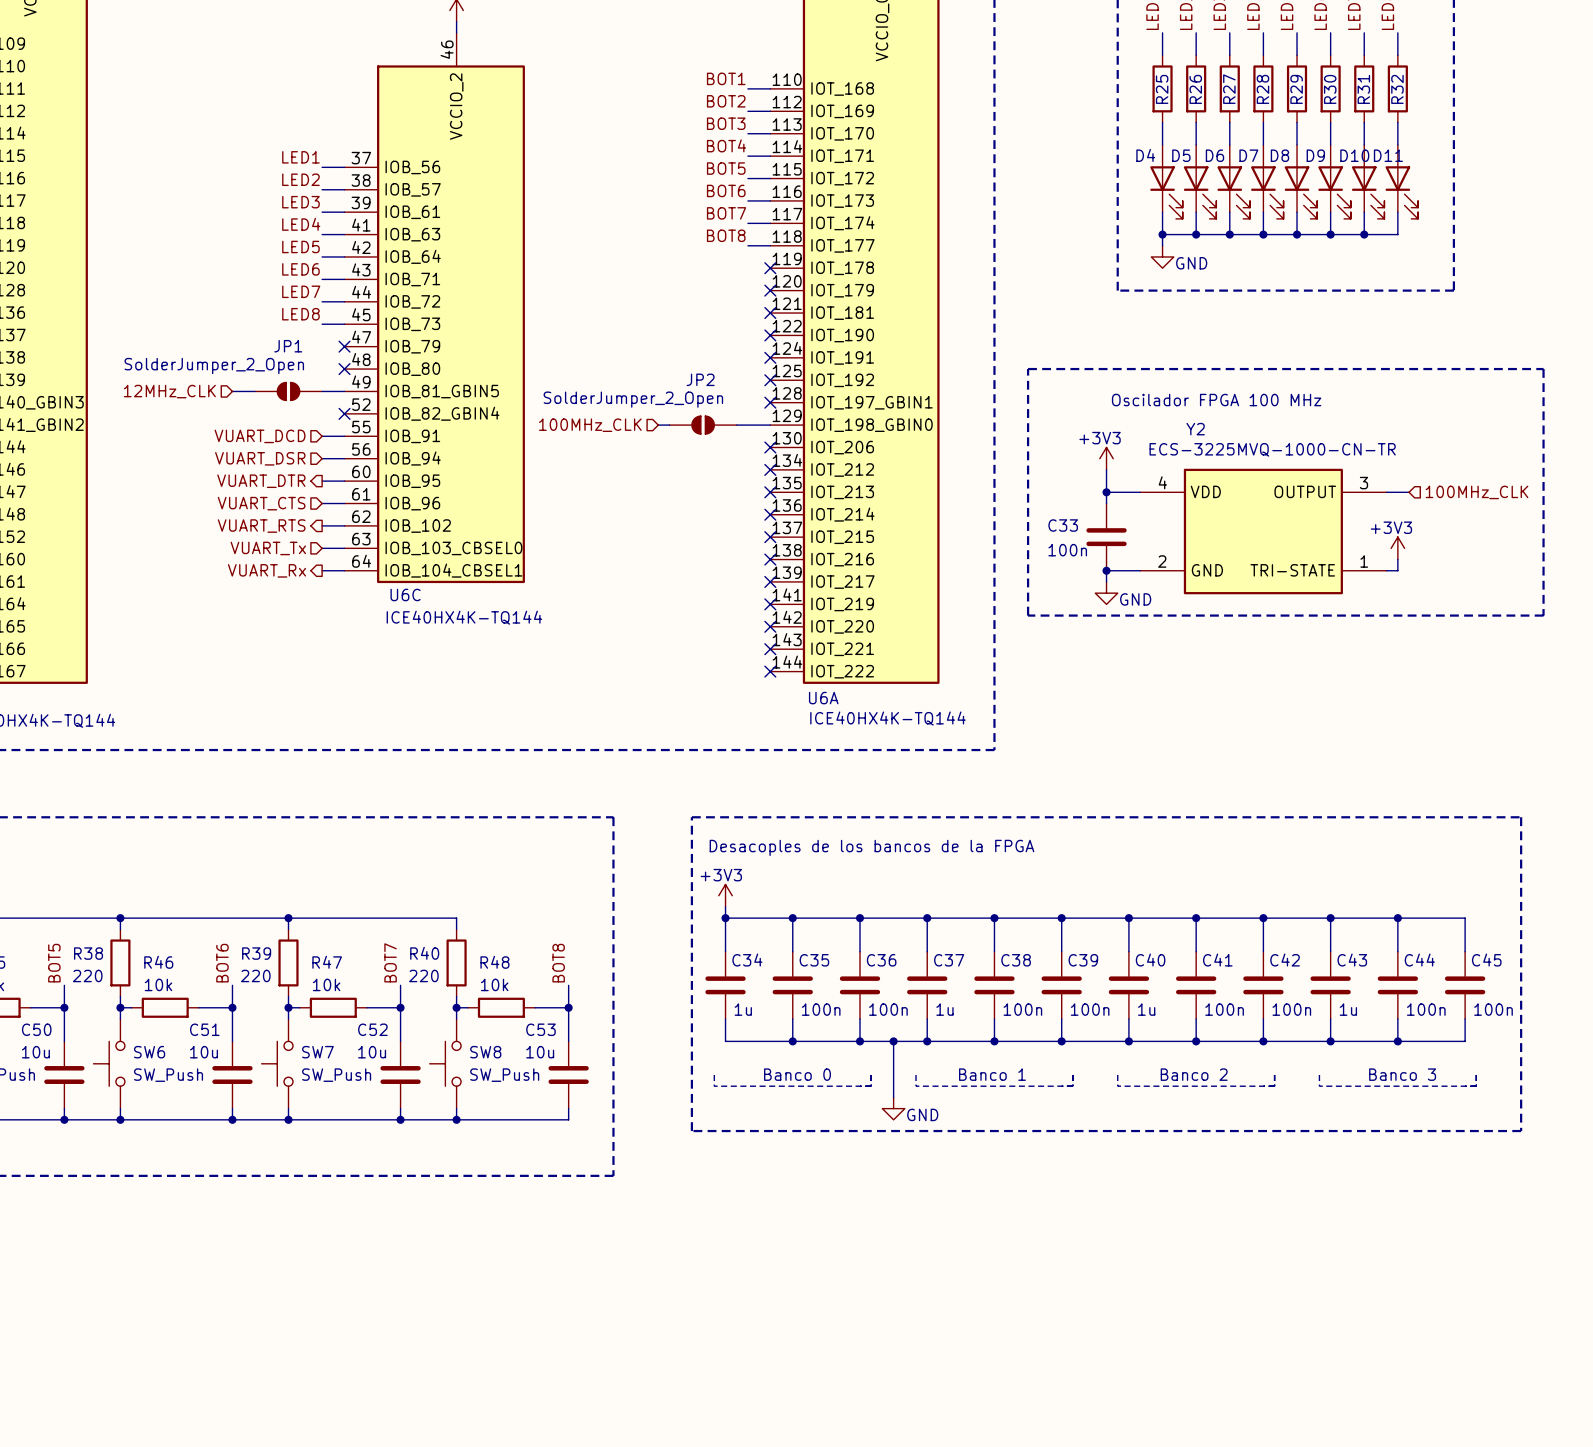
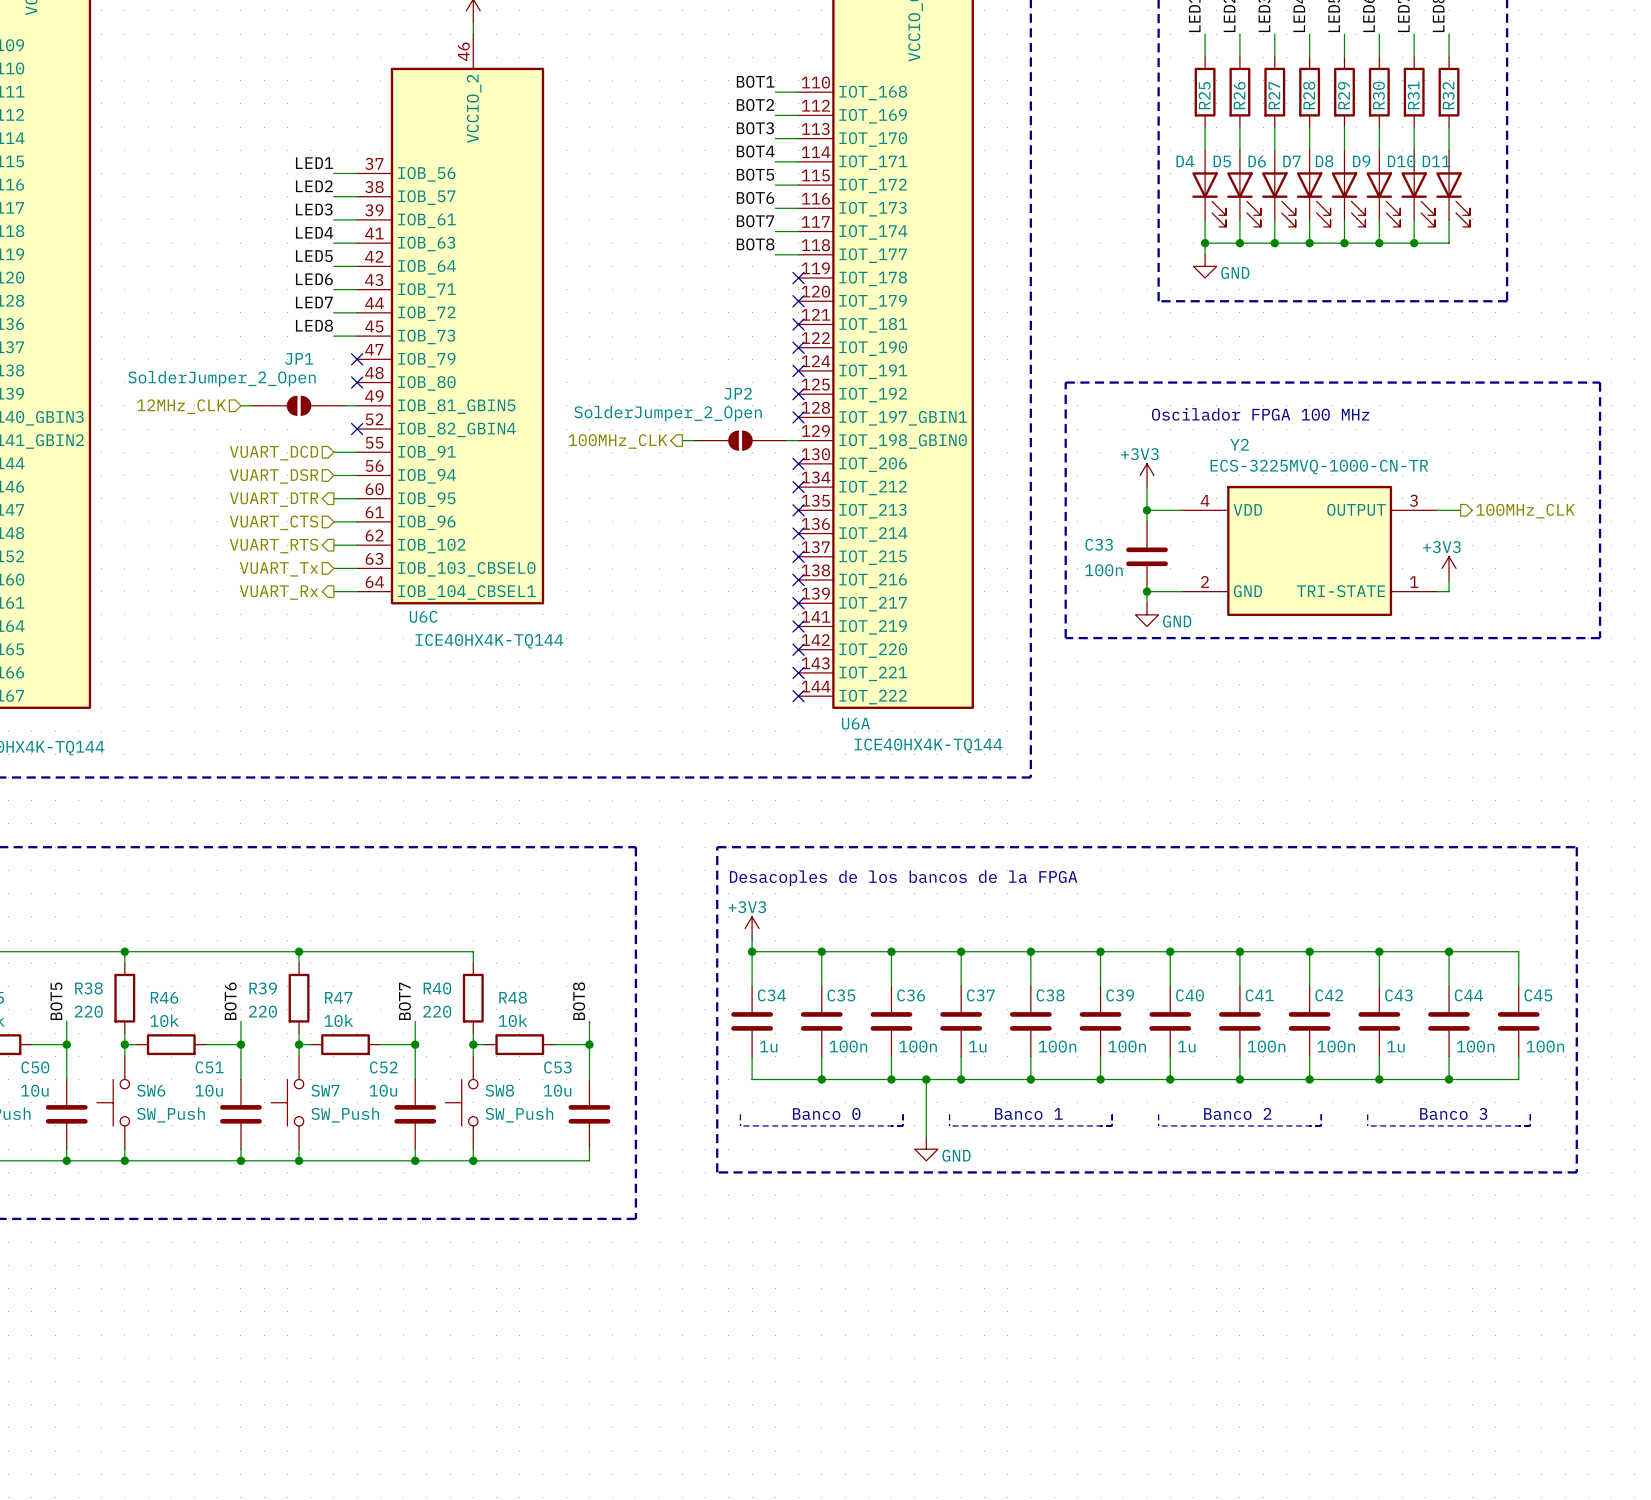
JP1 symbol: [254, 382, 323, 401] -> [252, 395, 346, 416]
JP2 symbol: [669, 416, 737, 435] -> [693, 430, 787, 451]
hierarchical label shape: input (590, 425) -> output (617, 441)
hierarchical label shape: input (1477, 492) -> output (1525, 511)

